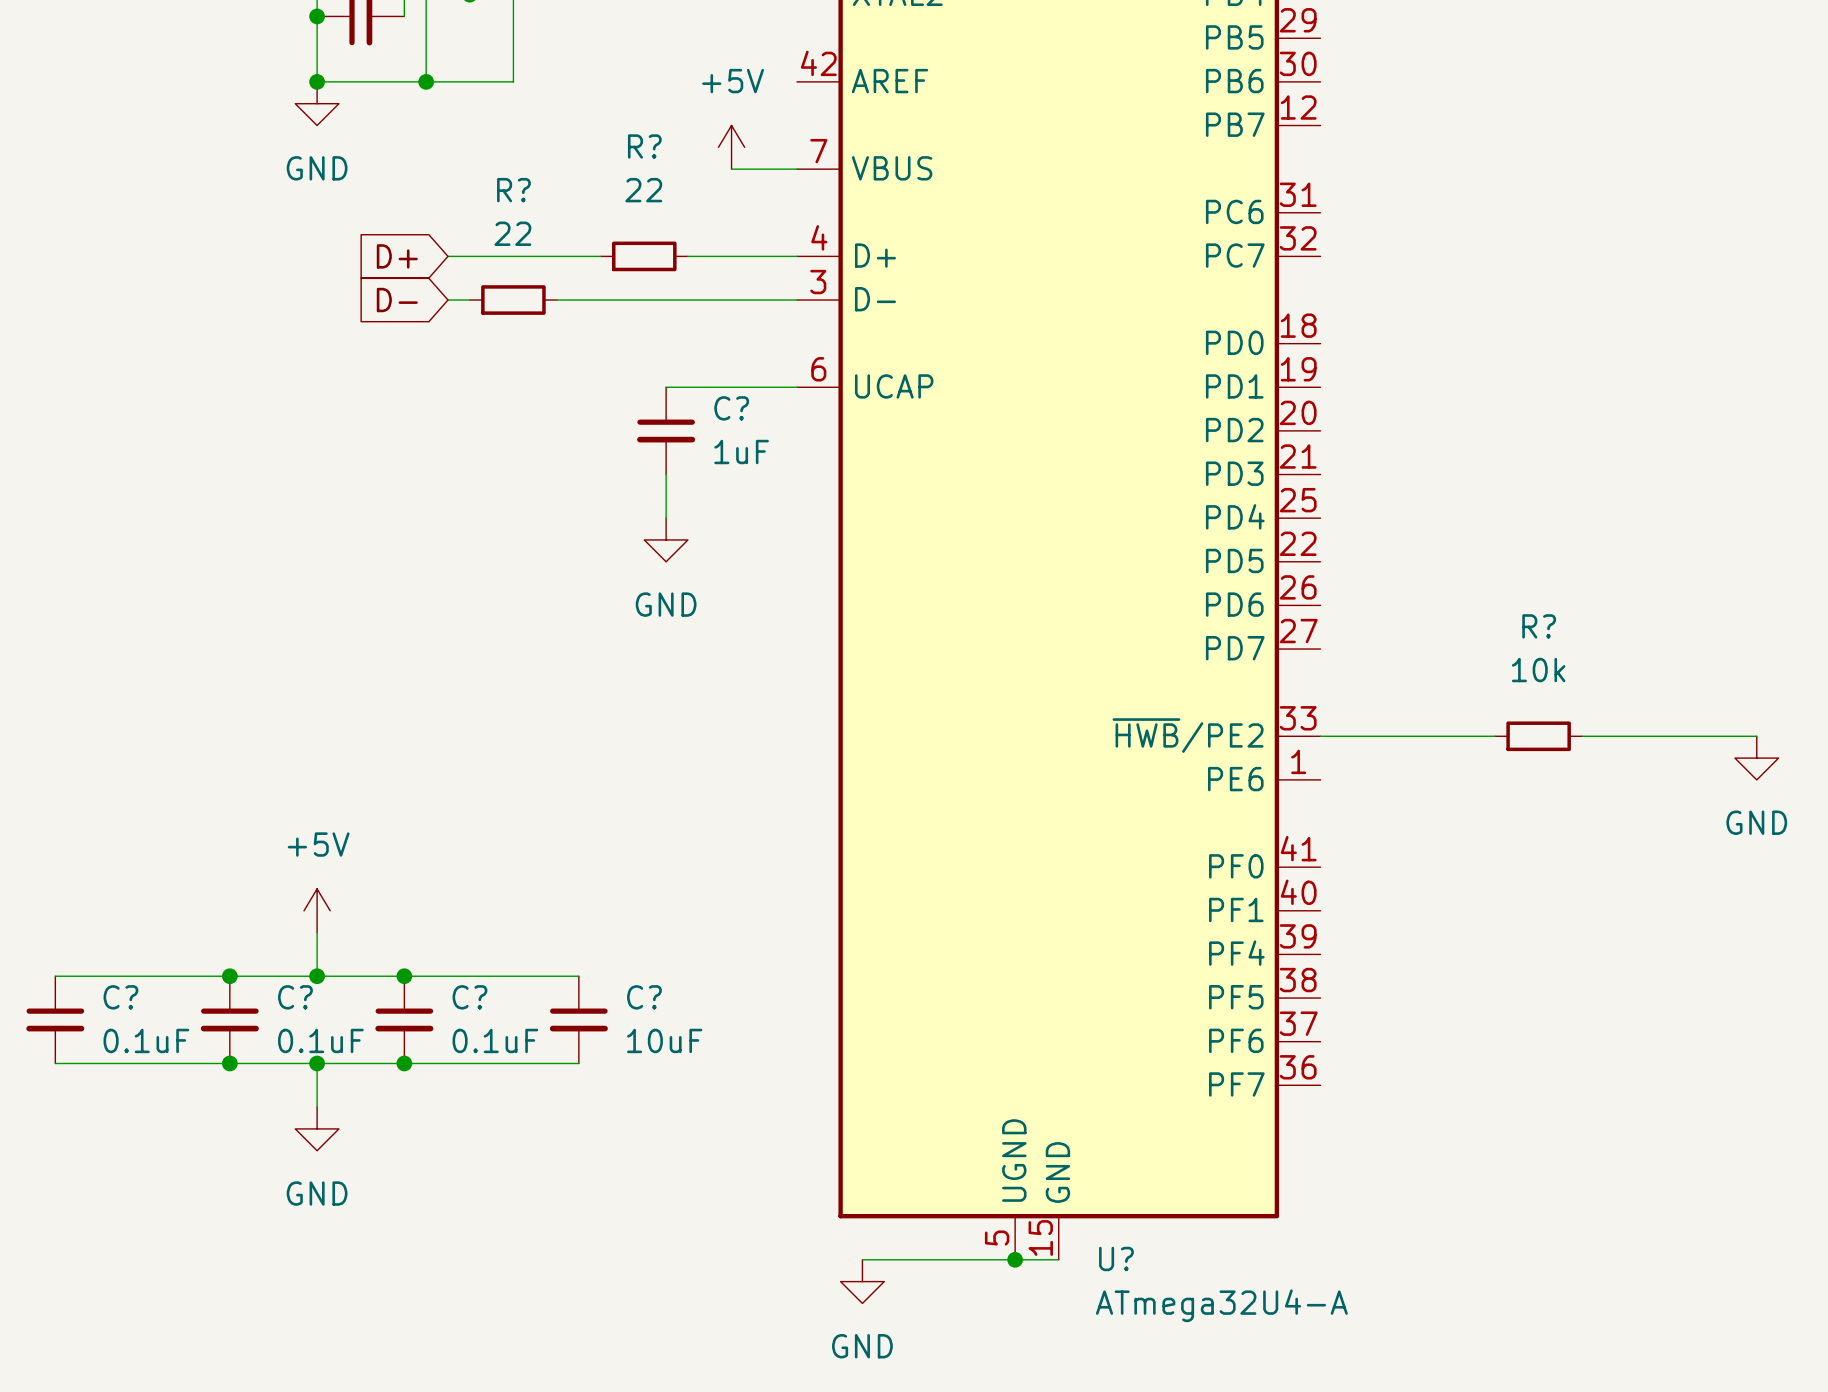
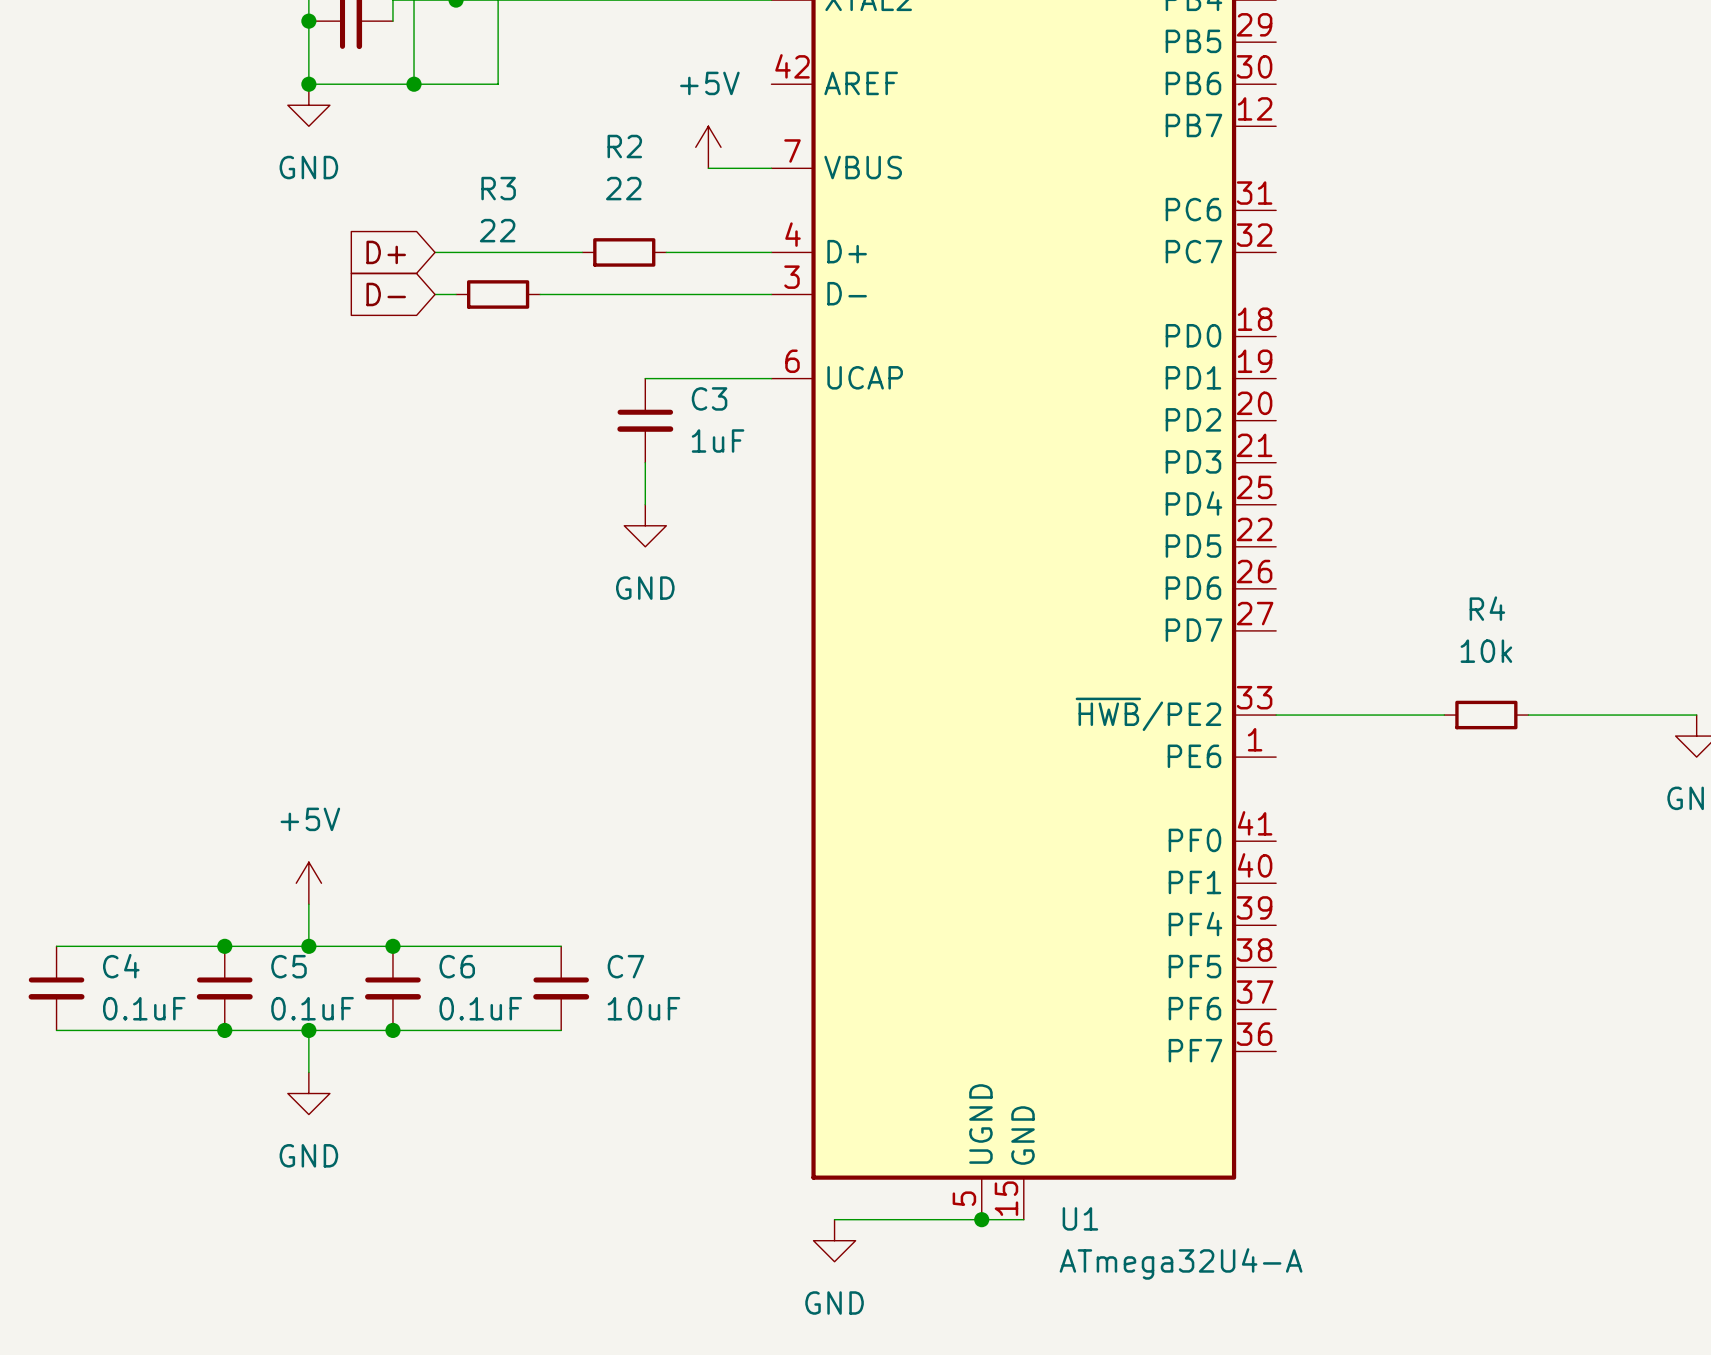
R? name: R? (644, 146) -> R2 (624, 146)
R? name: R? (513, 190) -> R3 (498, 188)
C? name: C? (731, 408) -> C3 (709, 398)
R? name: R? (1539, 626) -> R4 (1487, 608)
C? name: C? (120, 997) -> C4 (121, 966)
C? name: C? (295, 997) -> C5 (289, 966)
C? name: C? (469, 997) -> C6 (457, 966)
C? name: C? (644, 997) -> C7 (625, 966)
U? name: U? (1116, 1258) -> U1 (1080, 1218)

